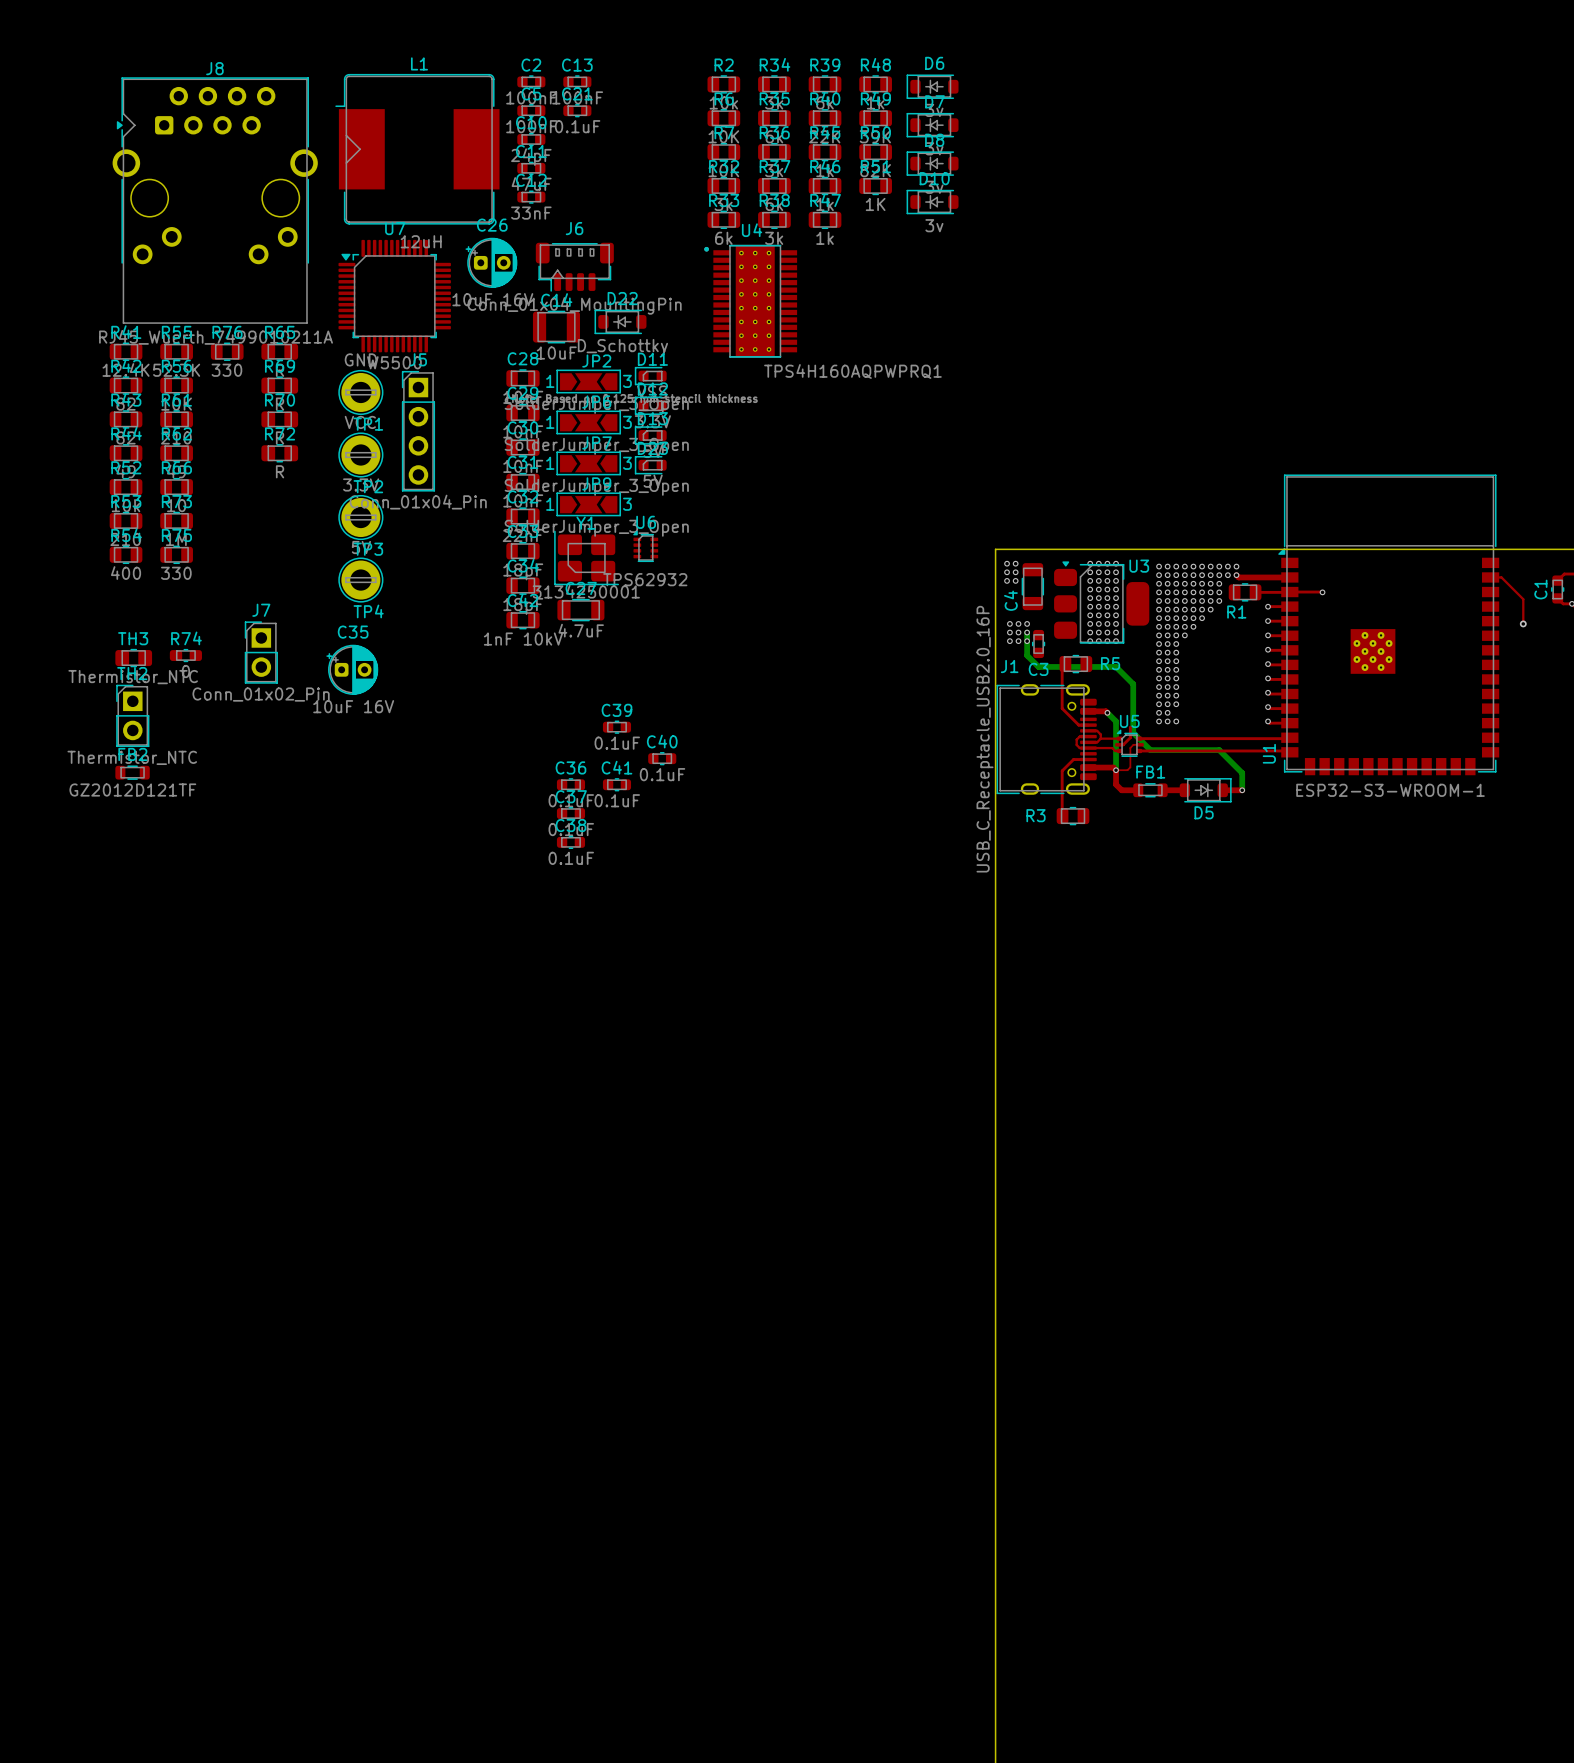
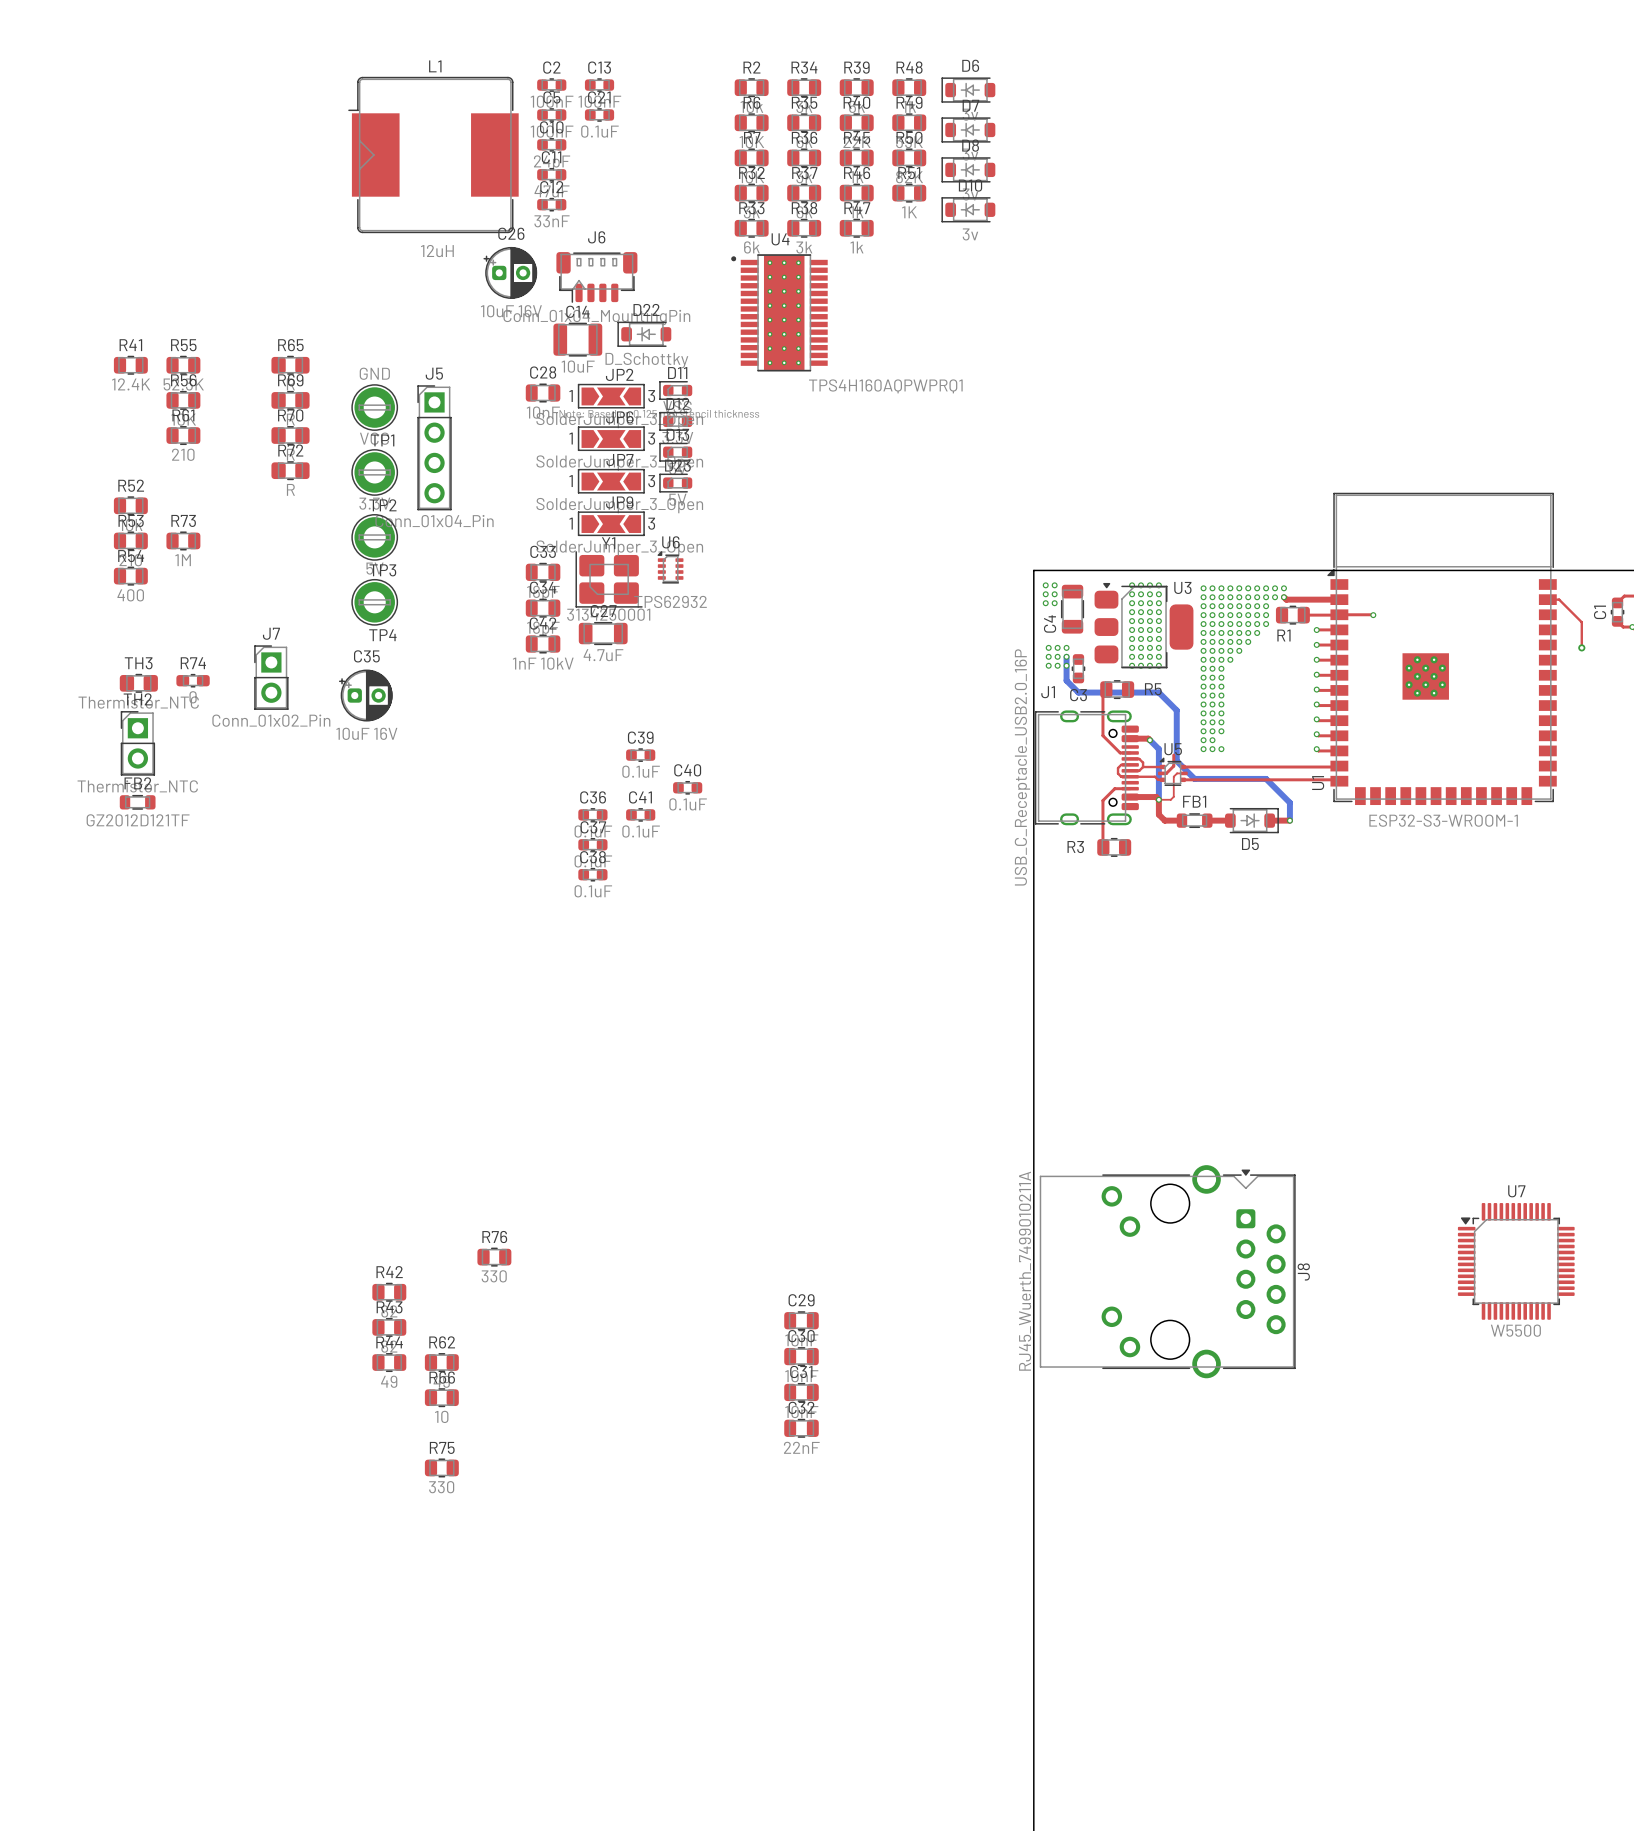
J8 rotation: 0° (215, 200) -> 90° clockwise (1167, 1271)
J8 position: (215, 200) -> (1167, 1271)
U7 position: (394, 296) -> (1516, 1261)
R76 position: (227, 351) -> (494, 1257)
R42 position: (126, 385) -> (389, 1292)
C29 position: (522, 413) -> (801, 1320)
R43 position: (126, 419) -> (389, 1327)
C30 position: (522, 447) -> (801, 1356)
R44 position: (126, 453) -> (389, 1362)
R62 position: (176, 453) -> (441, 1362)
C31 position: (522, 482) -> (801, 1392)
R66 position: (176, 487) -> (441, 1397)
C32 position: (522, 516) -> (801, 1428)
R75 position: (176, 554) -> (441, 1467)

